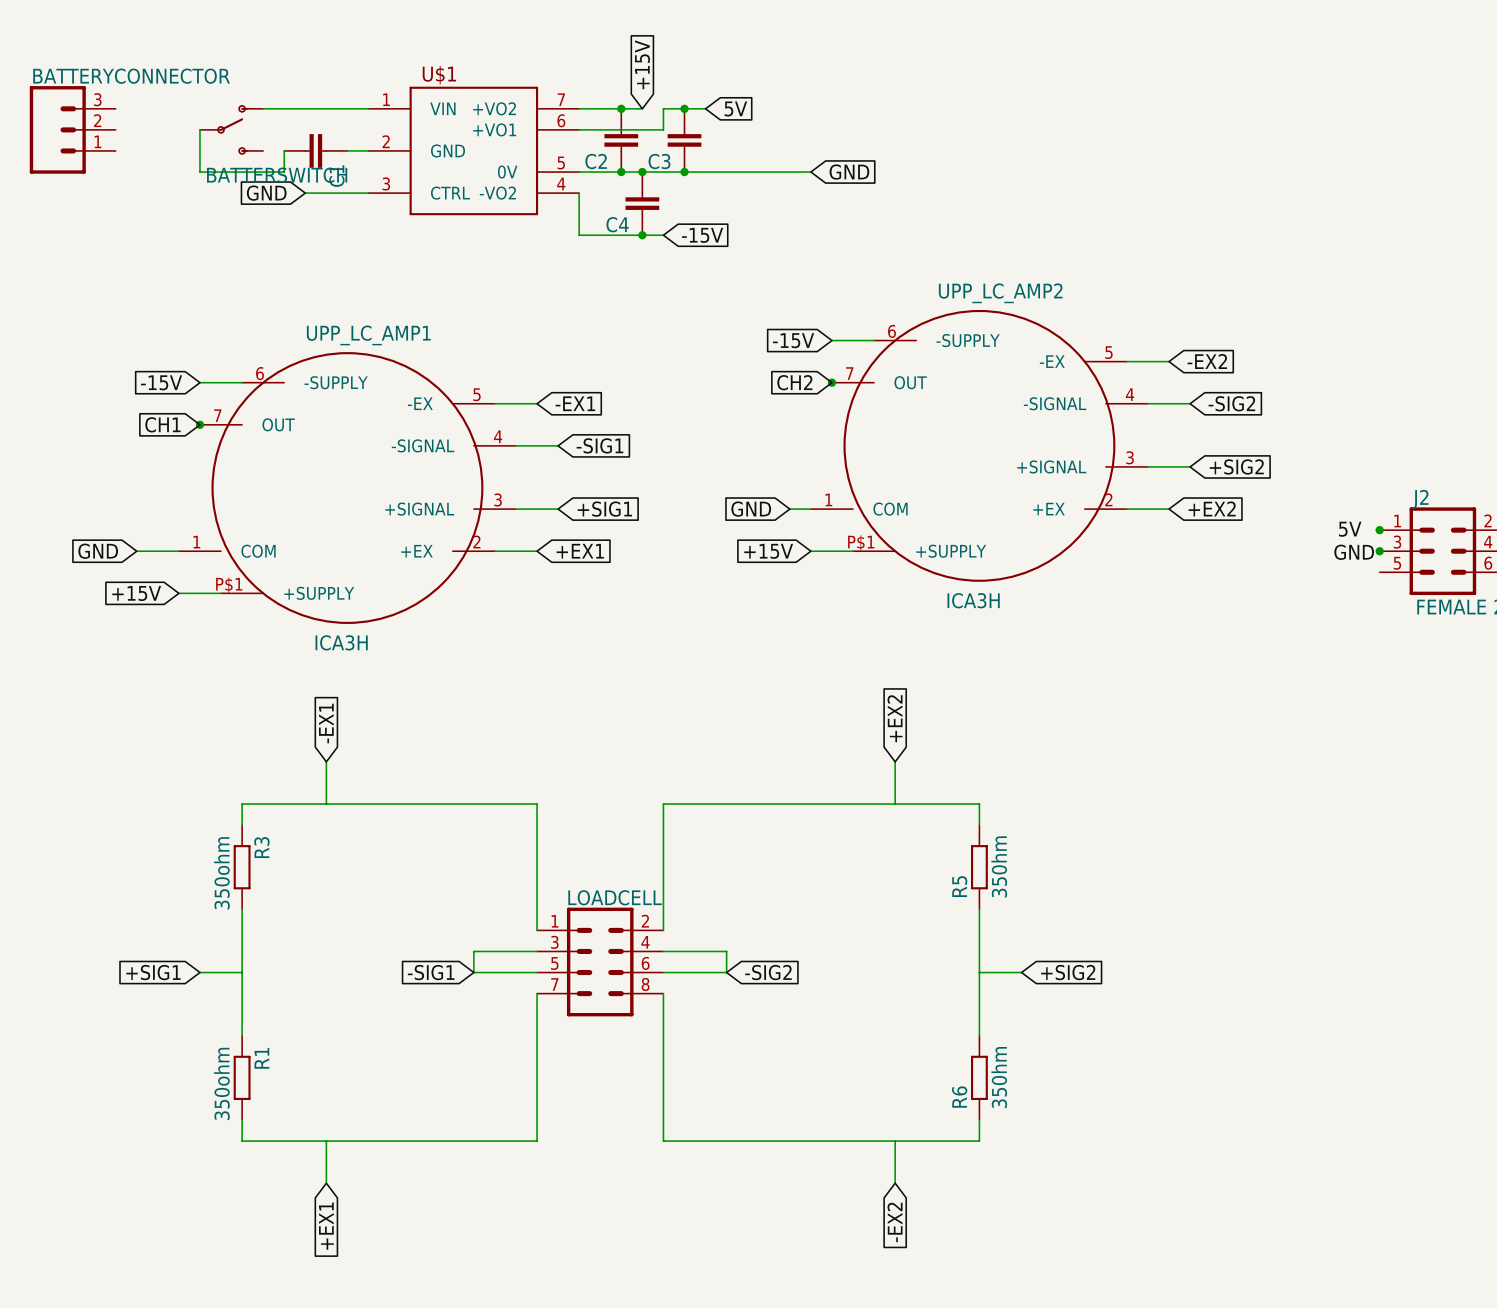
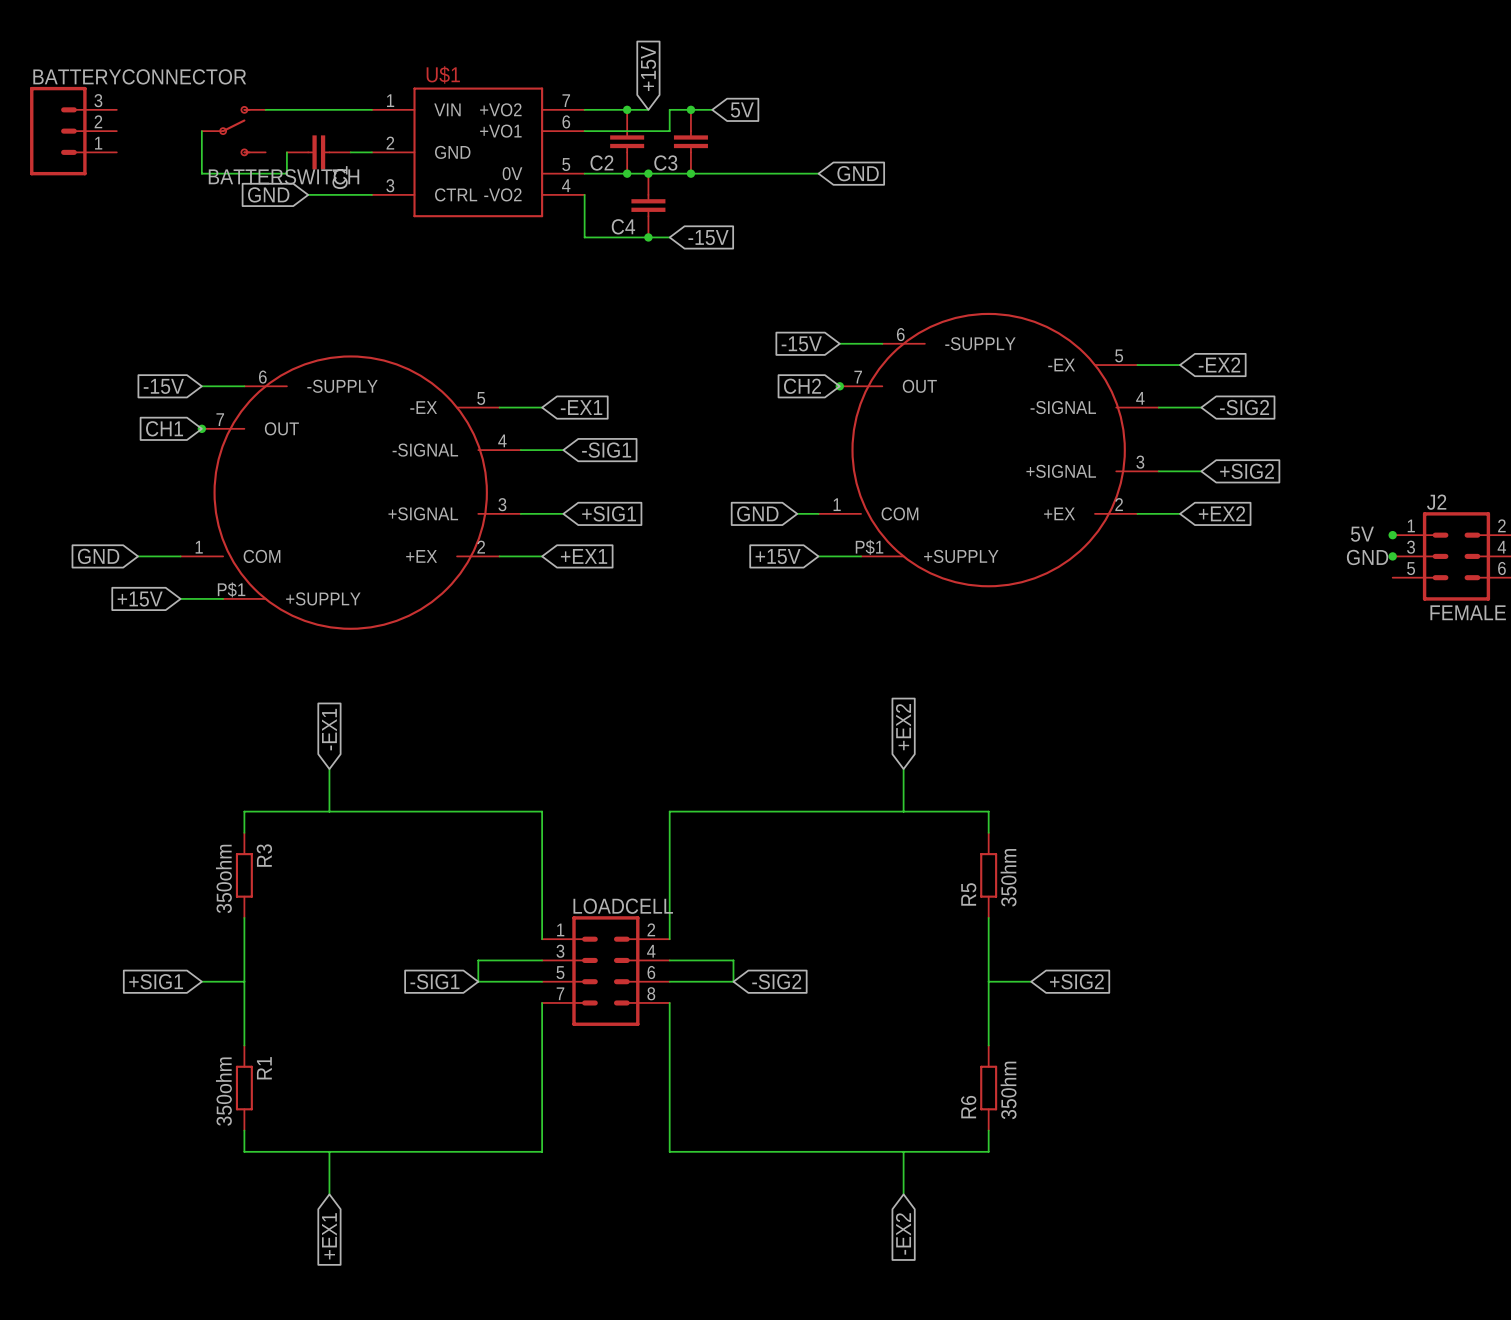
UPP_LC_AMP2 name: UPP_LC_AMP2 (1000, 293) -> none
UPP_LC_AMP1 name: UPP_LC_AMP1 (368, 335) -> none
UPP_LC_AMP2 value: ICA3H (973, 600) -> none
UPP_LC_AMP1 value: ICA3H (341, 642) -> none

